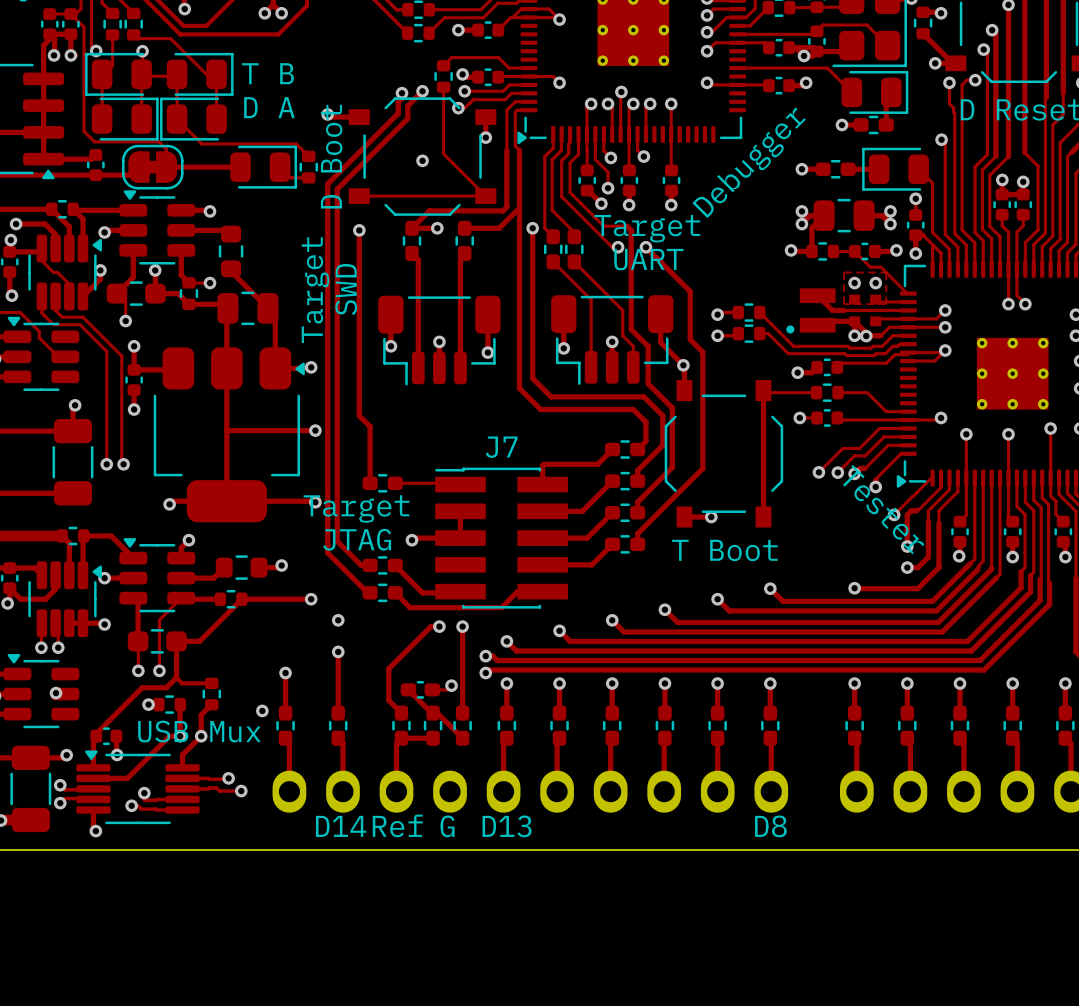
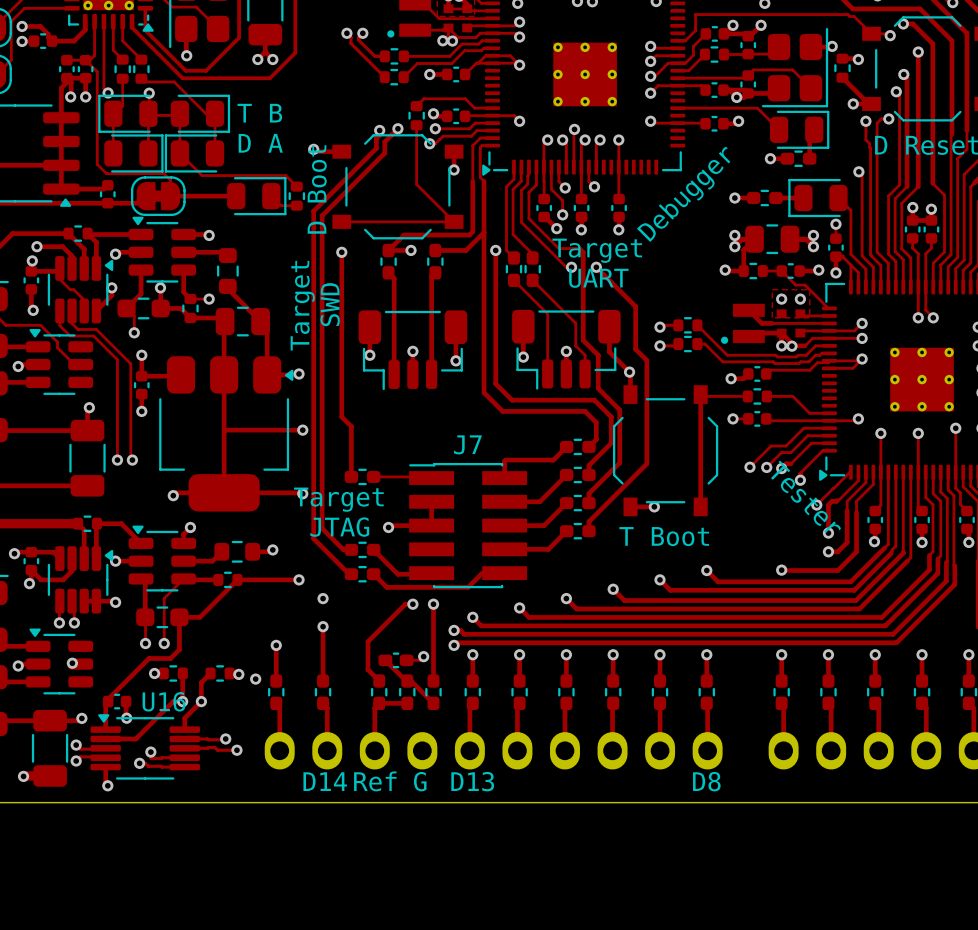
via: (422, 160) -> none
track: (176, 677) (182, 683) (211, 683) -> none
part rotation: 0° (211, 694) -> 90° clockwise (220, 673)
via: none -> (238, 674)
text: USB Mux (199, 731) -> none
U16 name: none -> U16 (164, 701)

